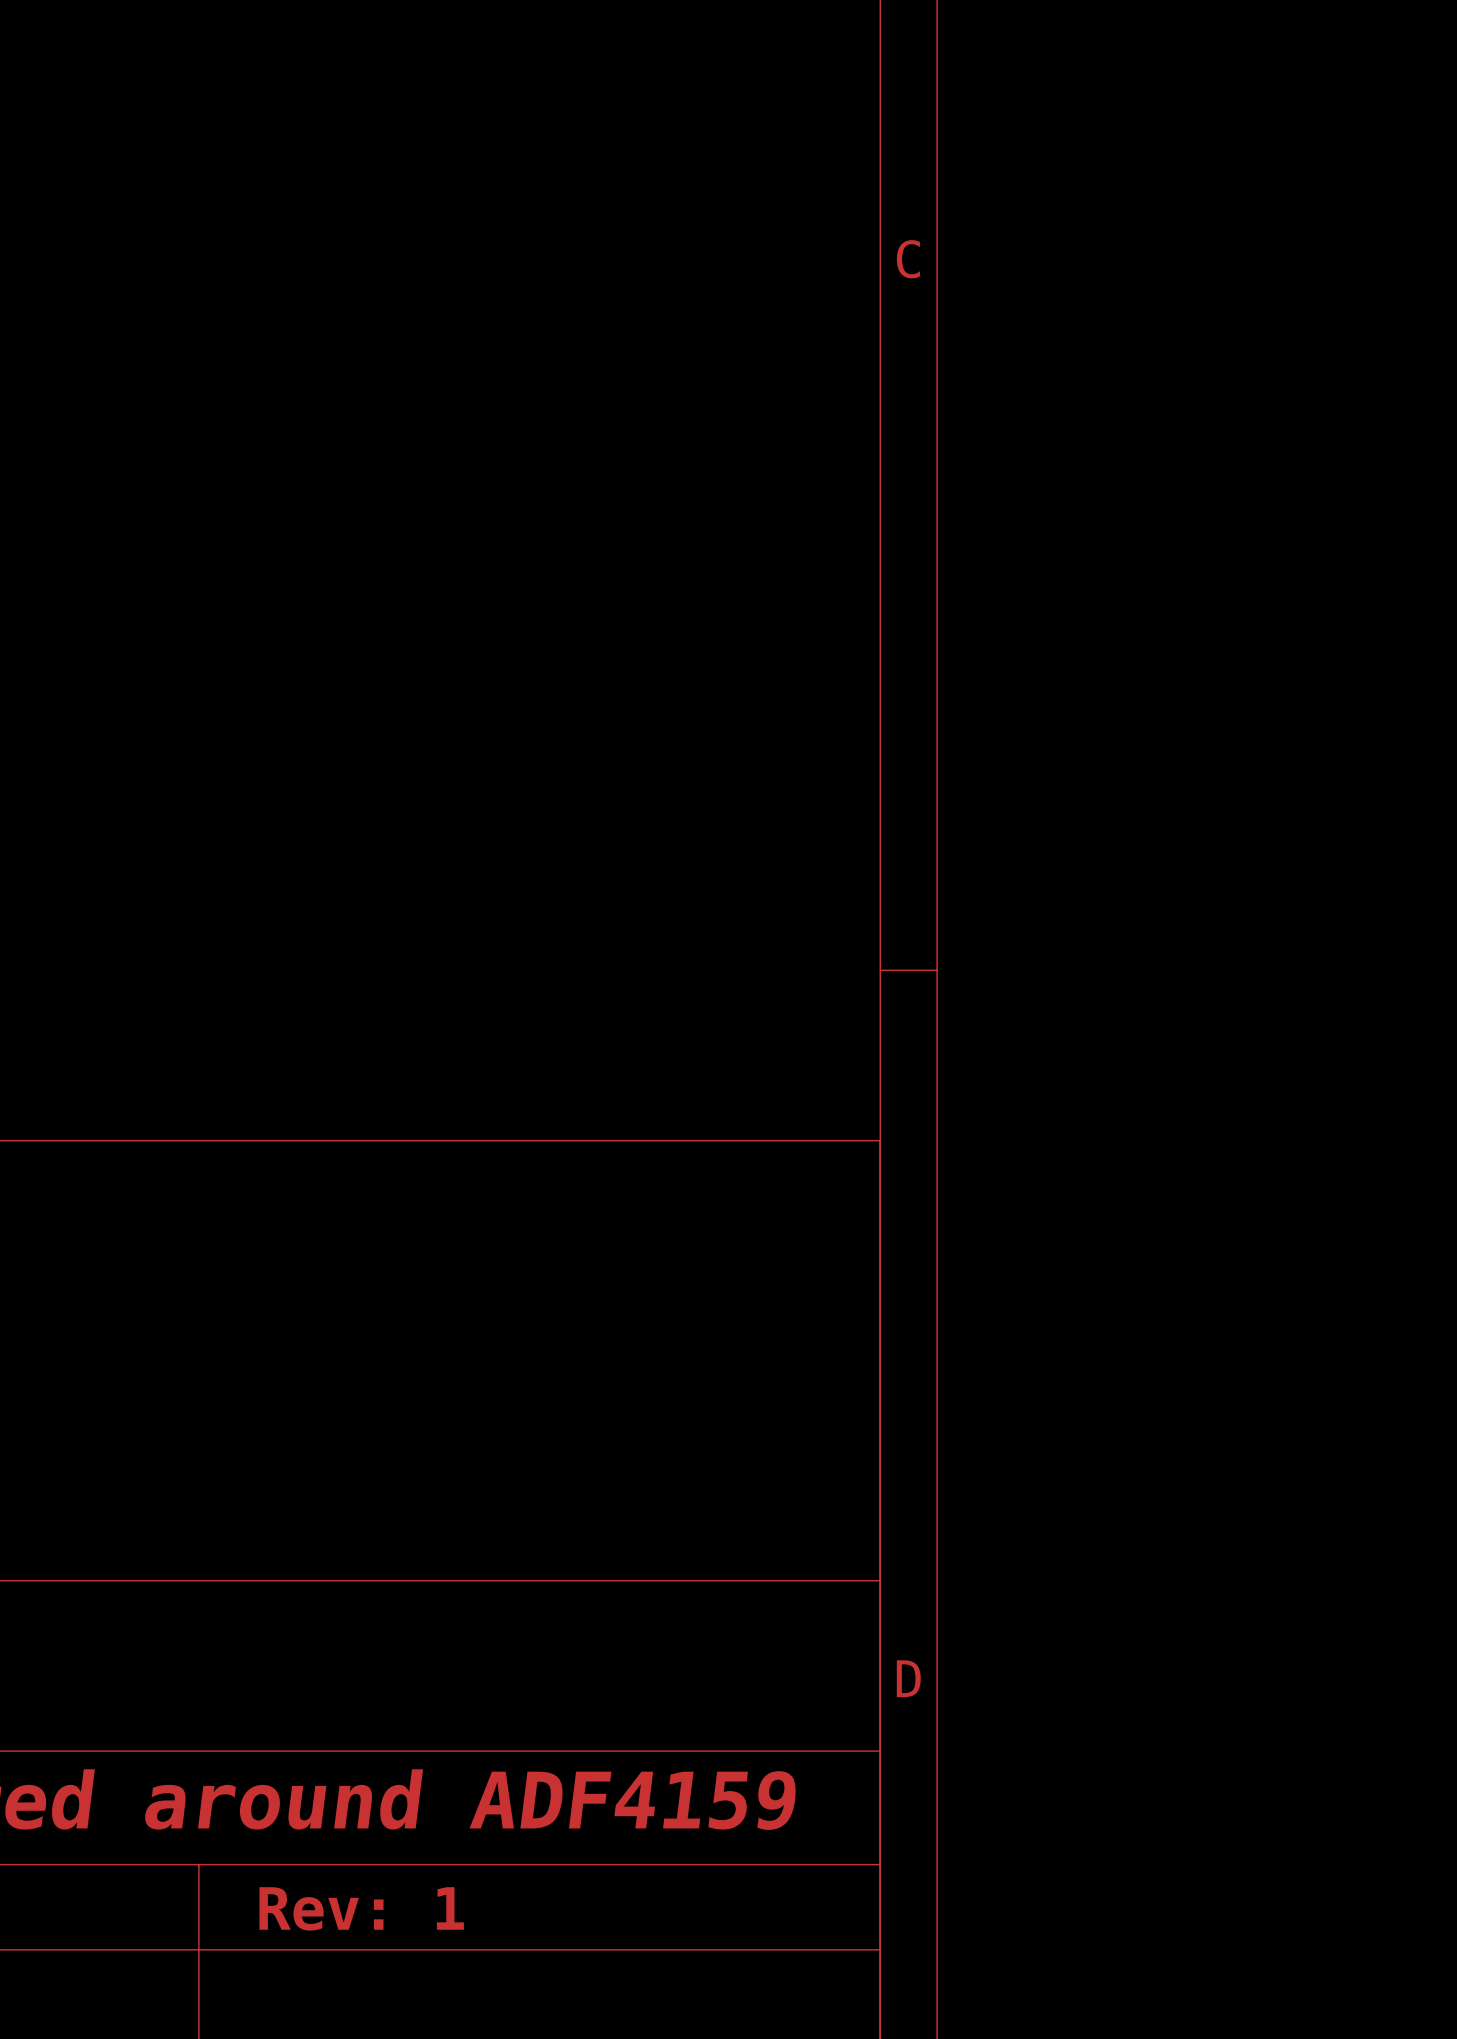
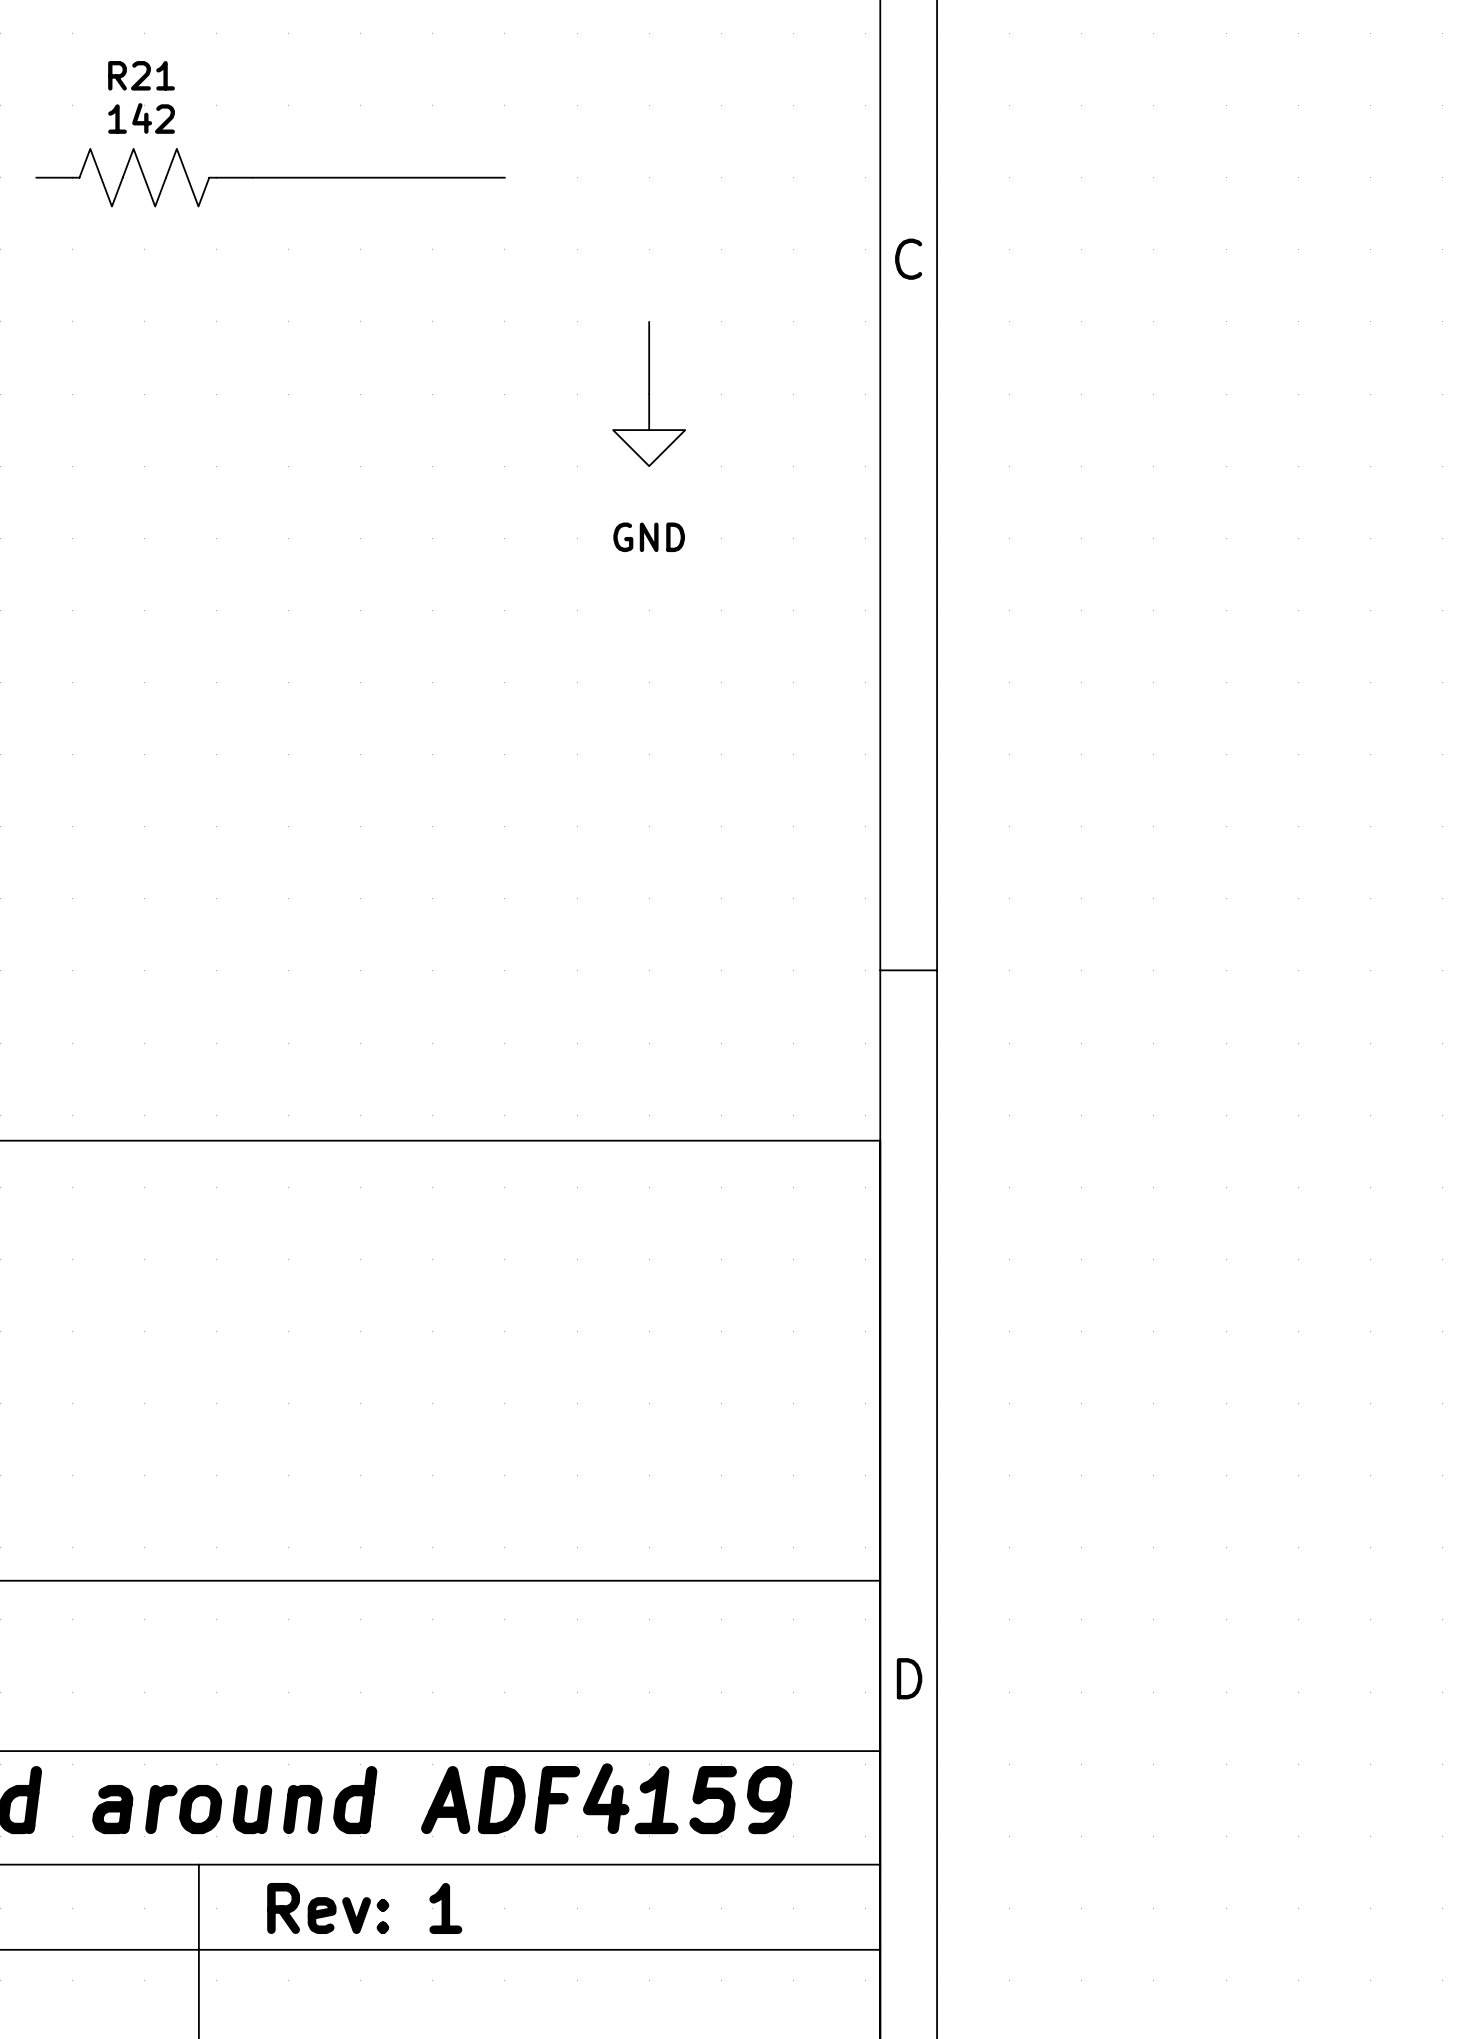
R21: none -> 142 (144, 177)
wire: none -> (252, 177) (504, 177)
wire: none -> (649, 321) (649, 394)
power symbol: none -> GND (649, 430)

